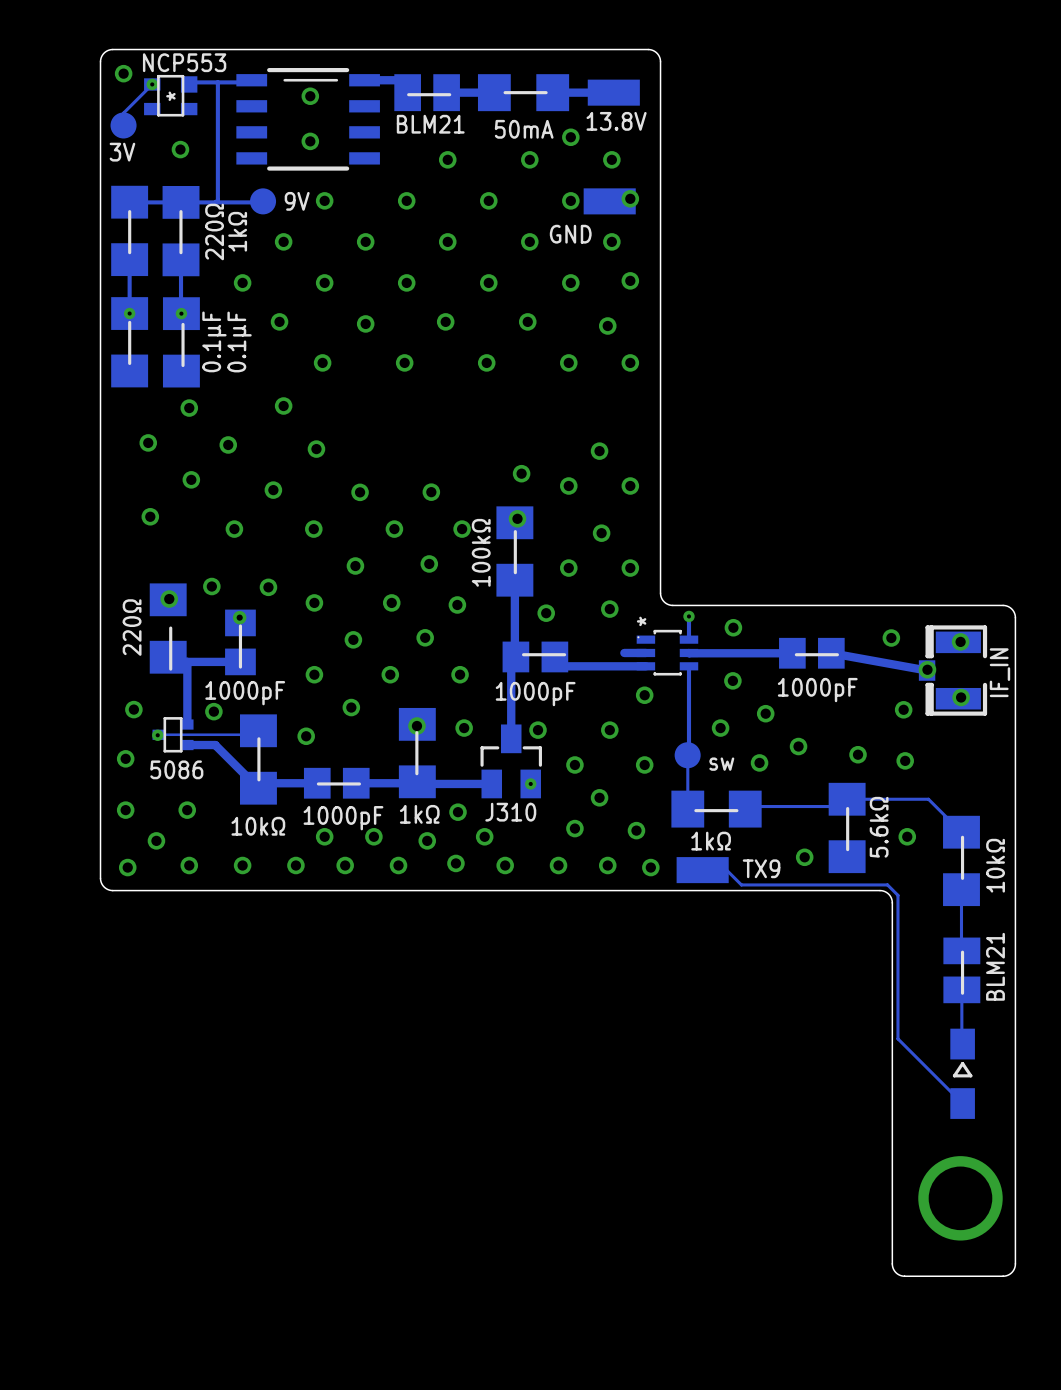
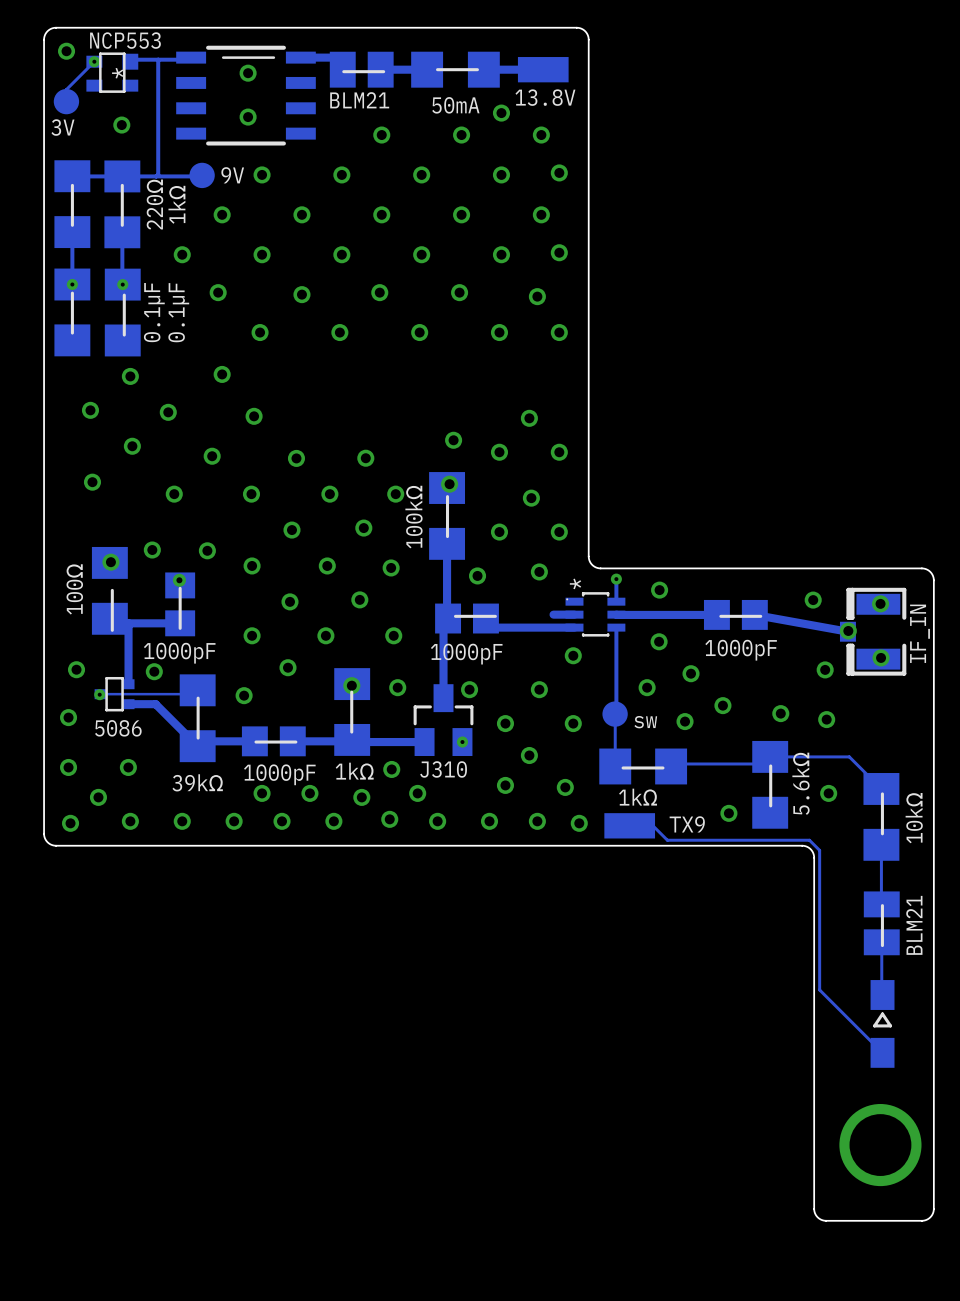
GND: (609, 201) -> none
part value: 220Ω (132, 627) -> 100Ω (74, 589)
part value: 10kΩ (258, 826) -> 39kΩ (197, 782)

